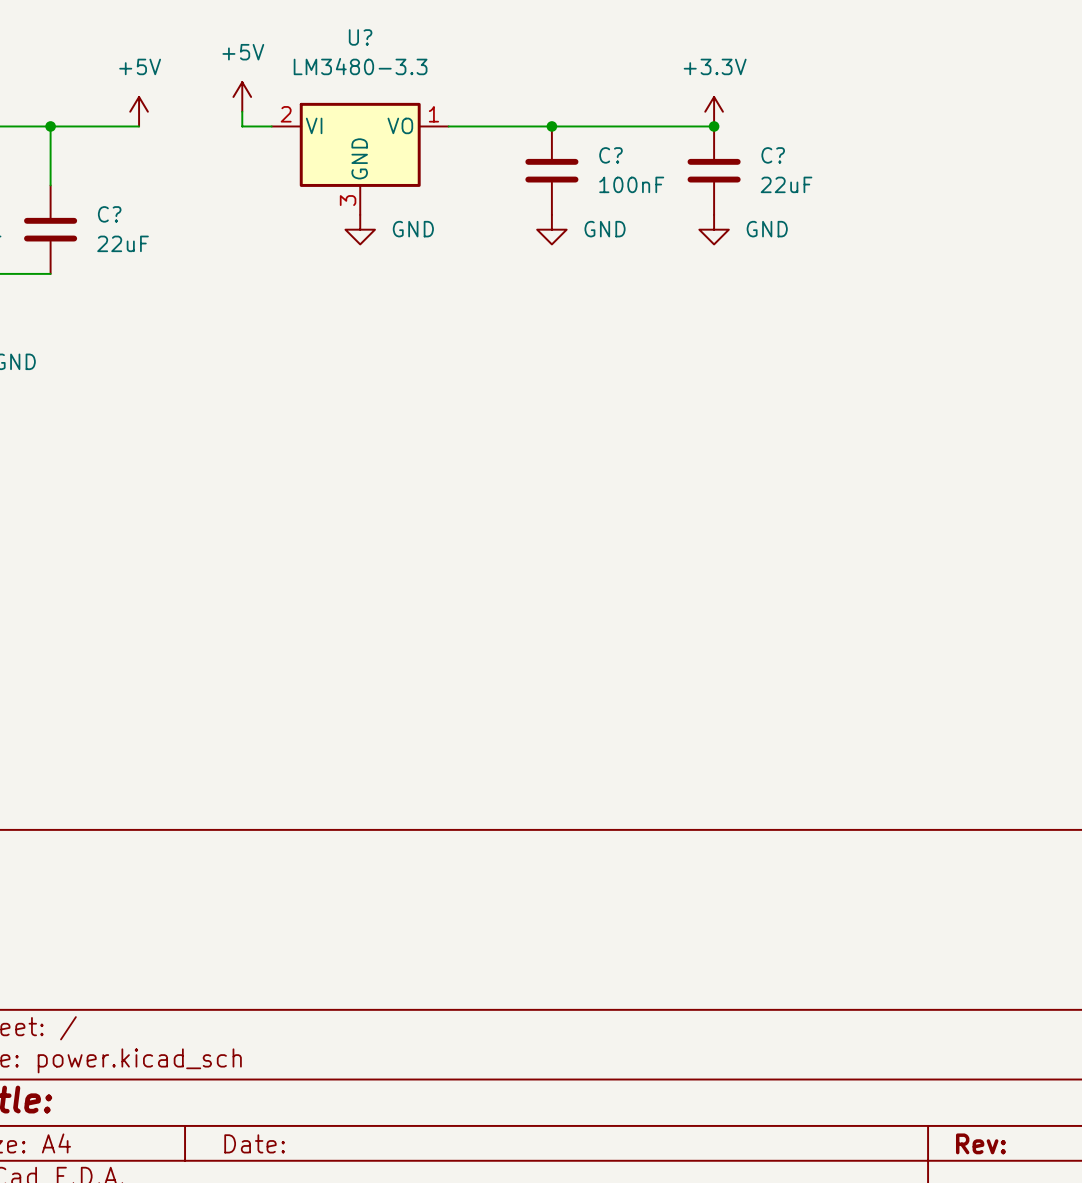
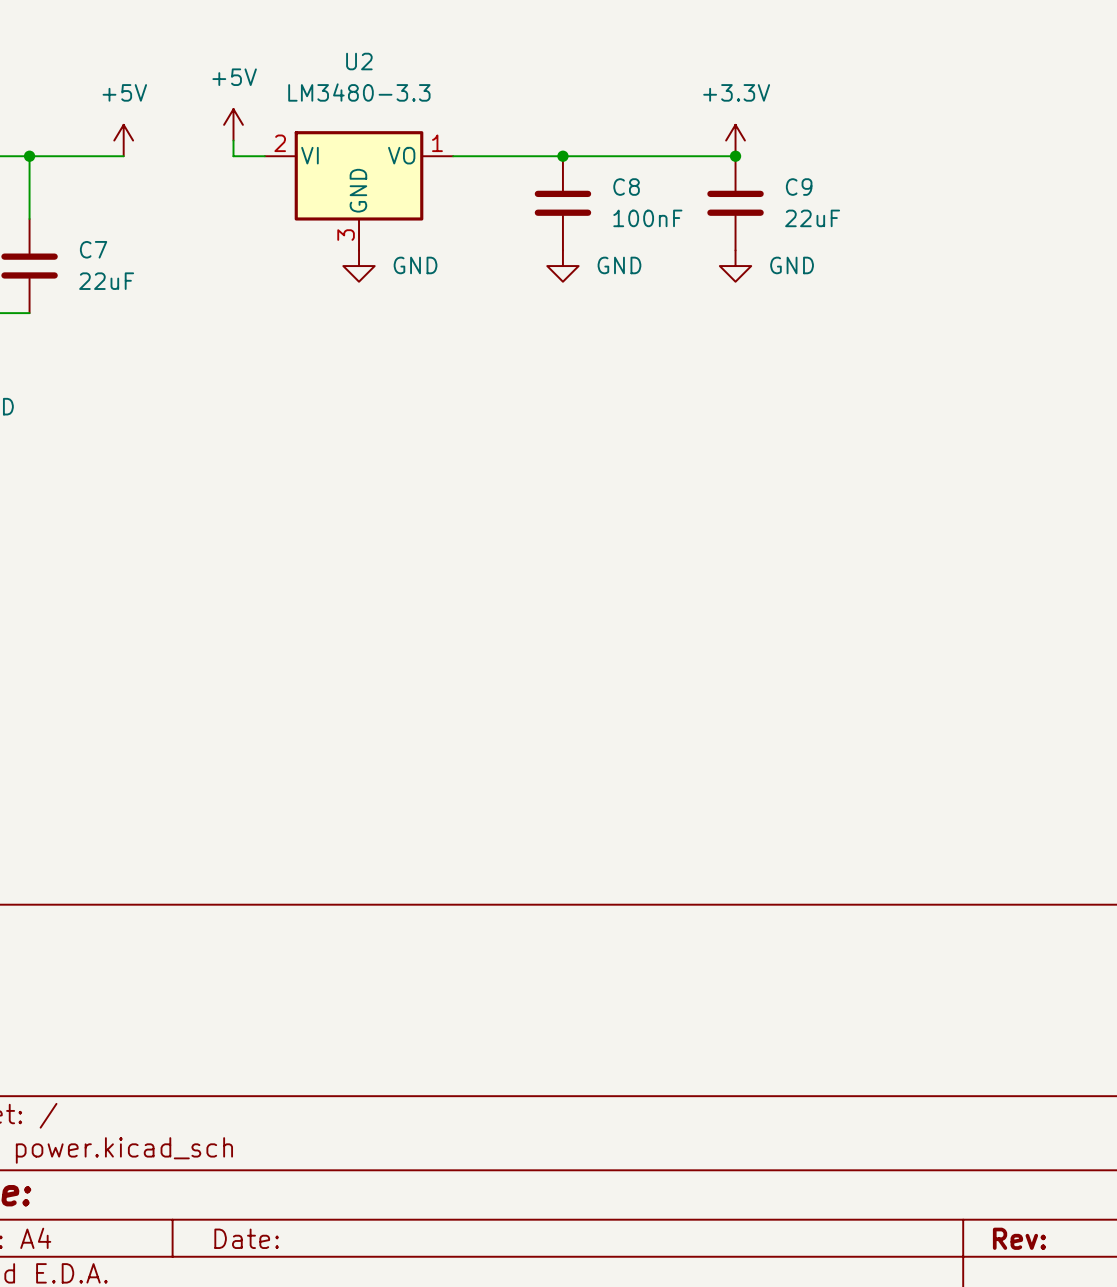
U? name: U? (360, 37) -> U2 (359, 61)
C? name: C? (610, 155) -> C8 (626, 187)
C? name: C? (773, 155) -> C9 (799, 187)
C? name: C? (109, 214) -> C7 (93, 249)

